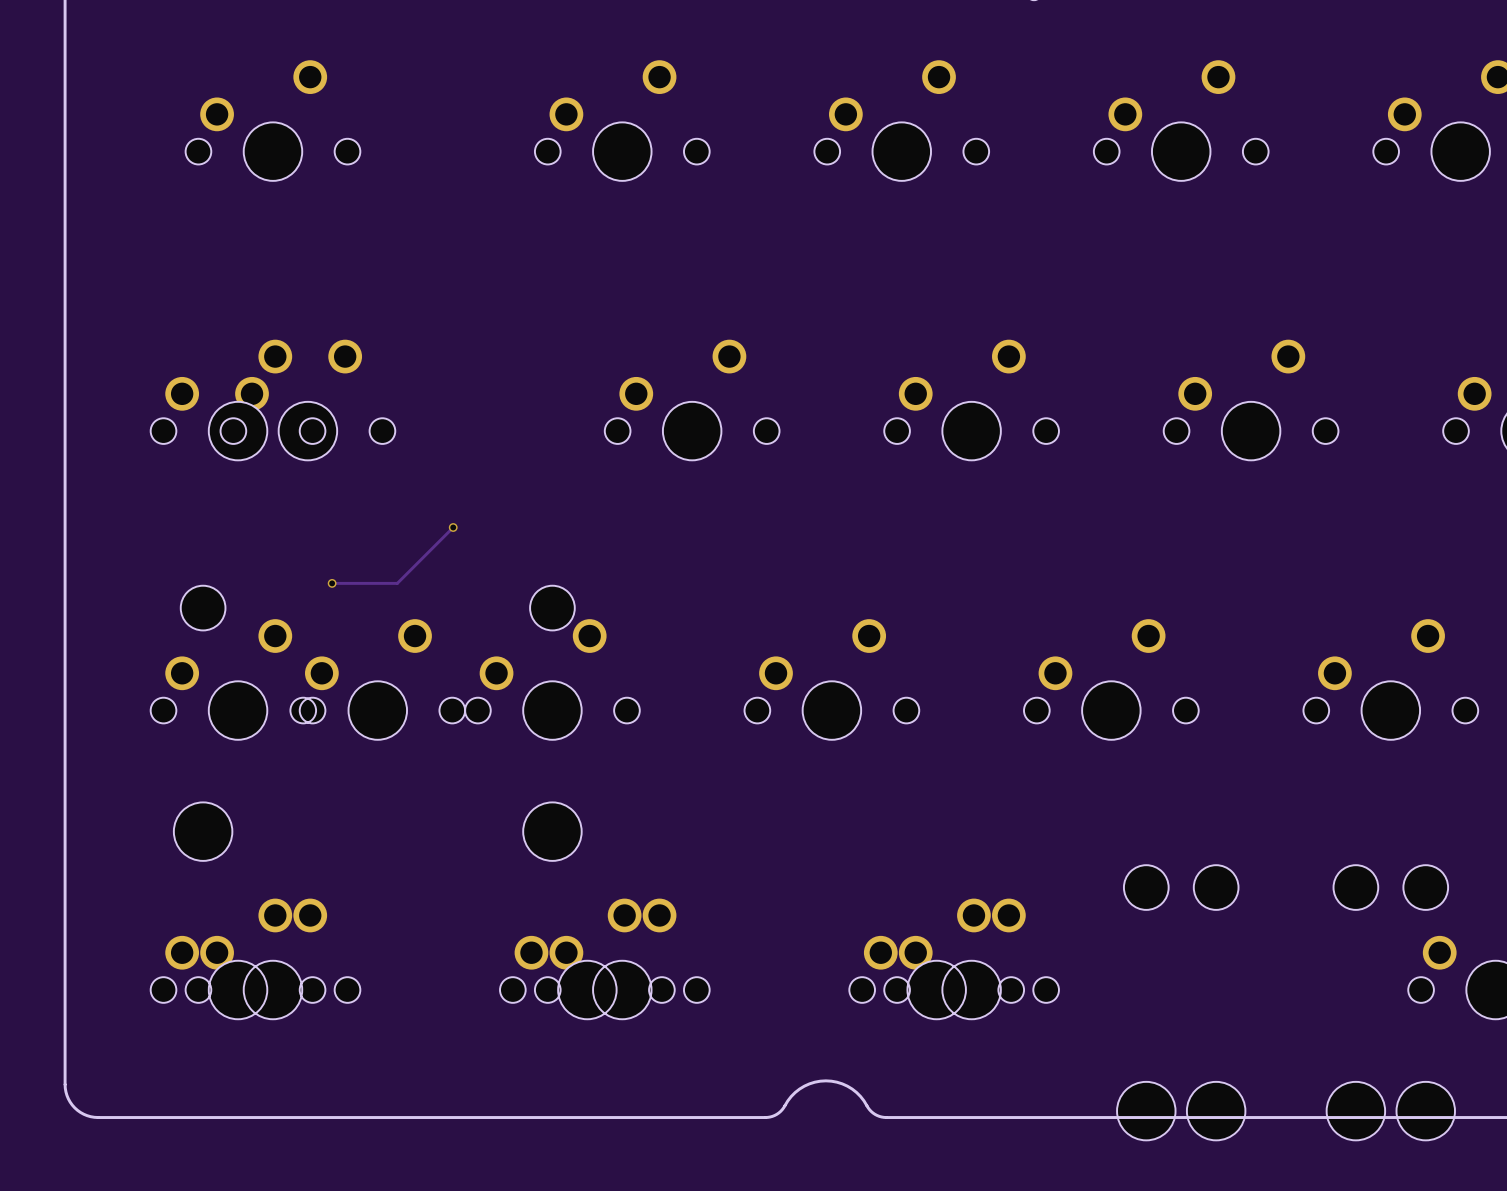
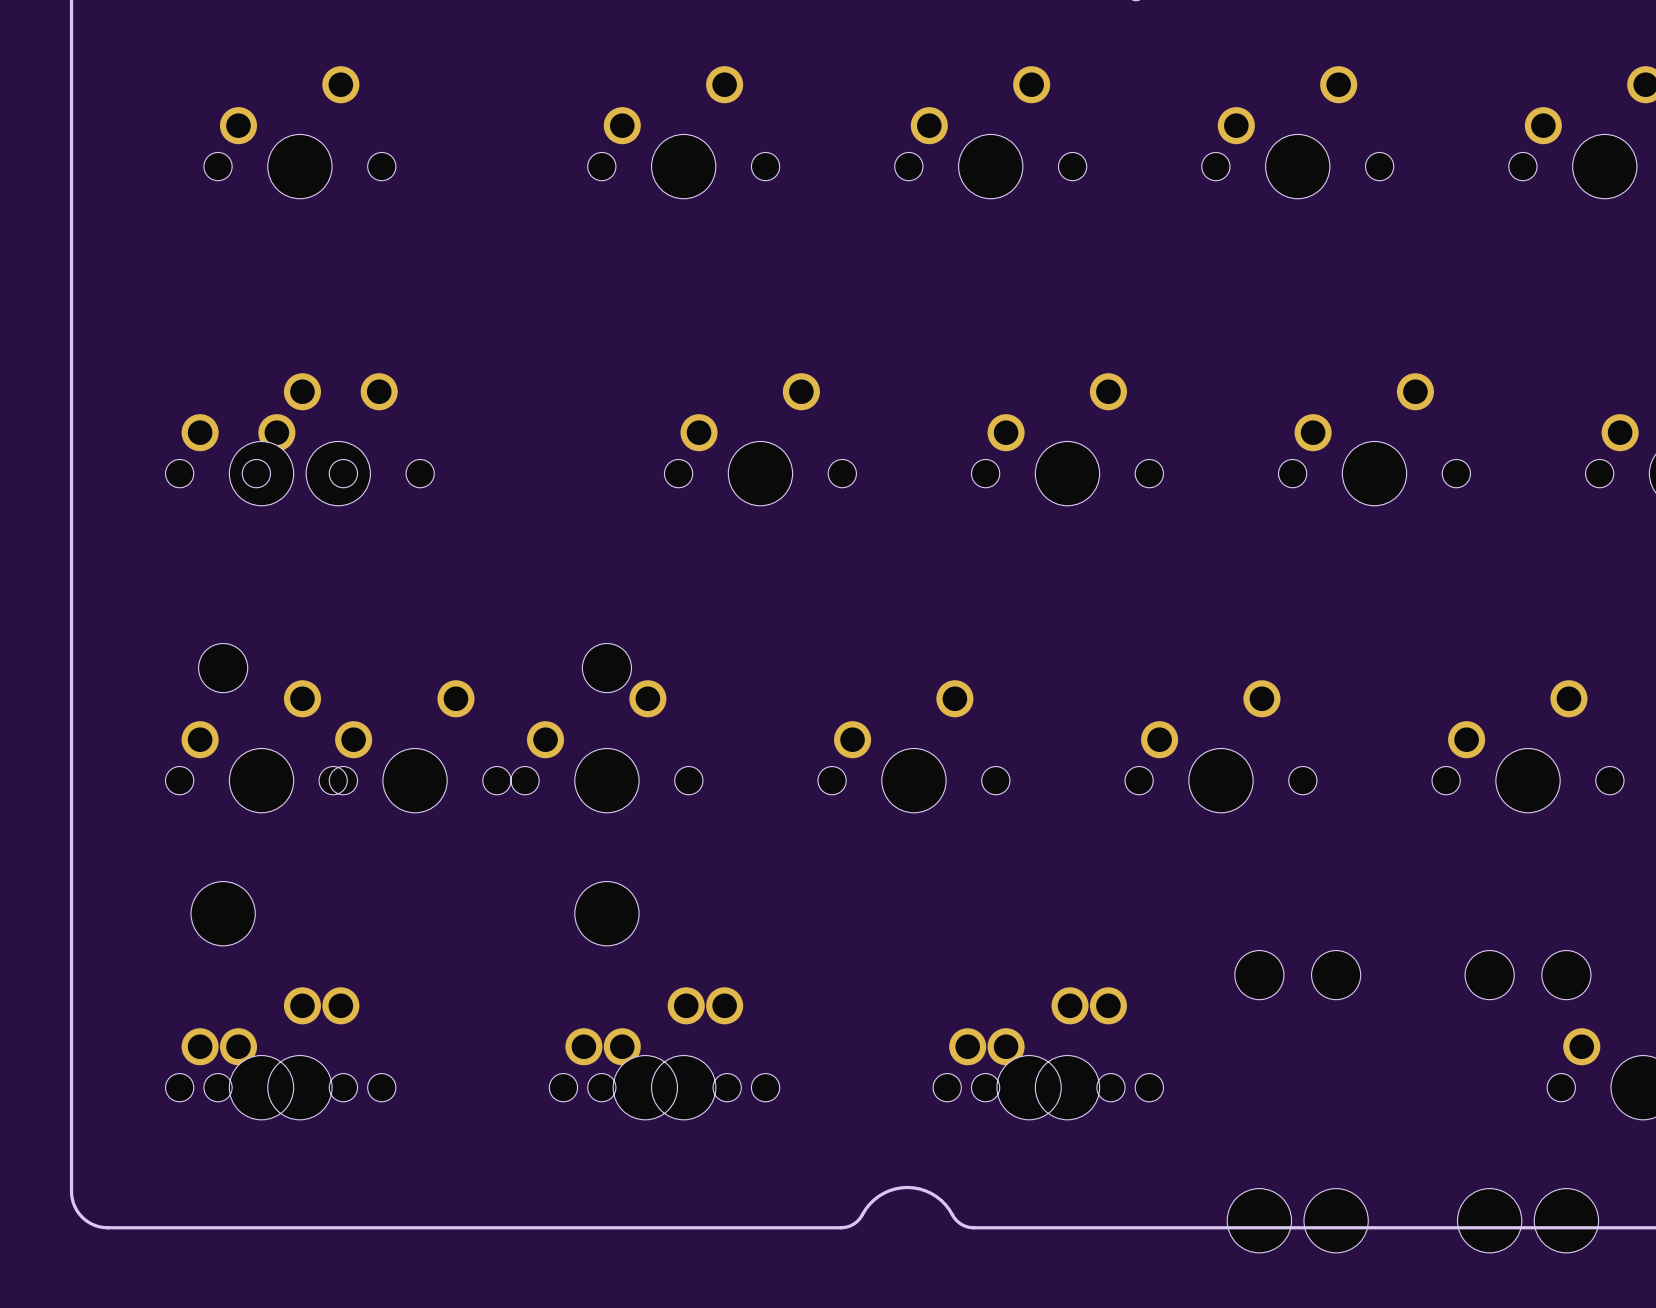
track: (453, 527) (397, 583) (332, 583) -> none
via: (453, 527) -> none
via: (332, 583) -> none

